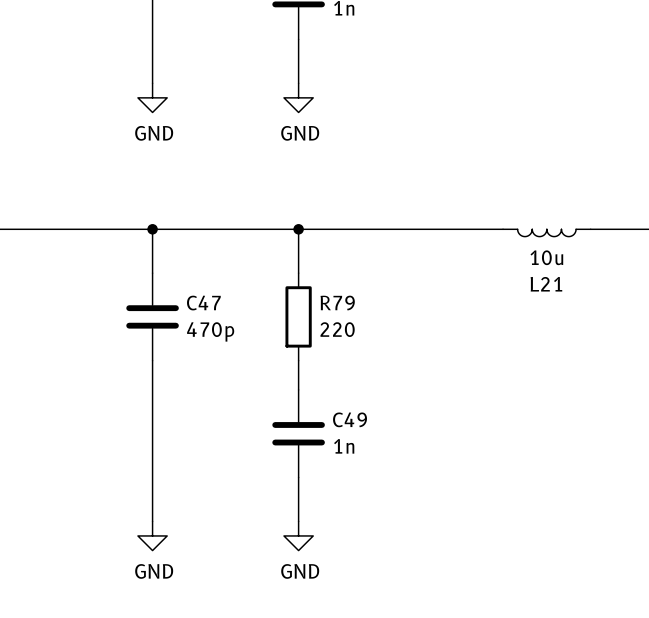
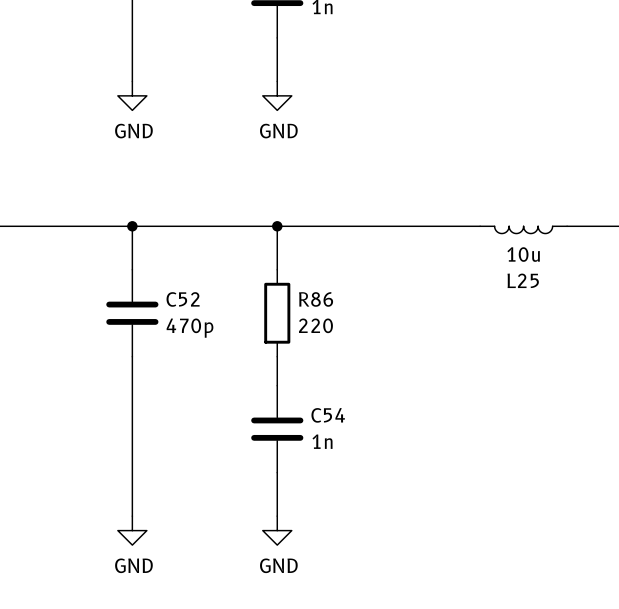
L21 name: L21 (546, 284) -> L25 (523, 280)
C47 name: C47 (203, 303) -> C52 (183, 299)
R79 name: R79 (337, 303) -> R86 (316, 299)
C49 name: C49 (350, 419) -> C54 (328, 415)

